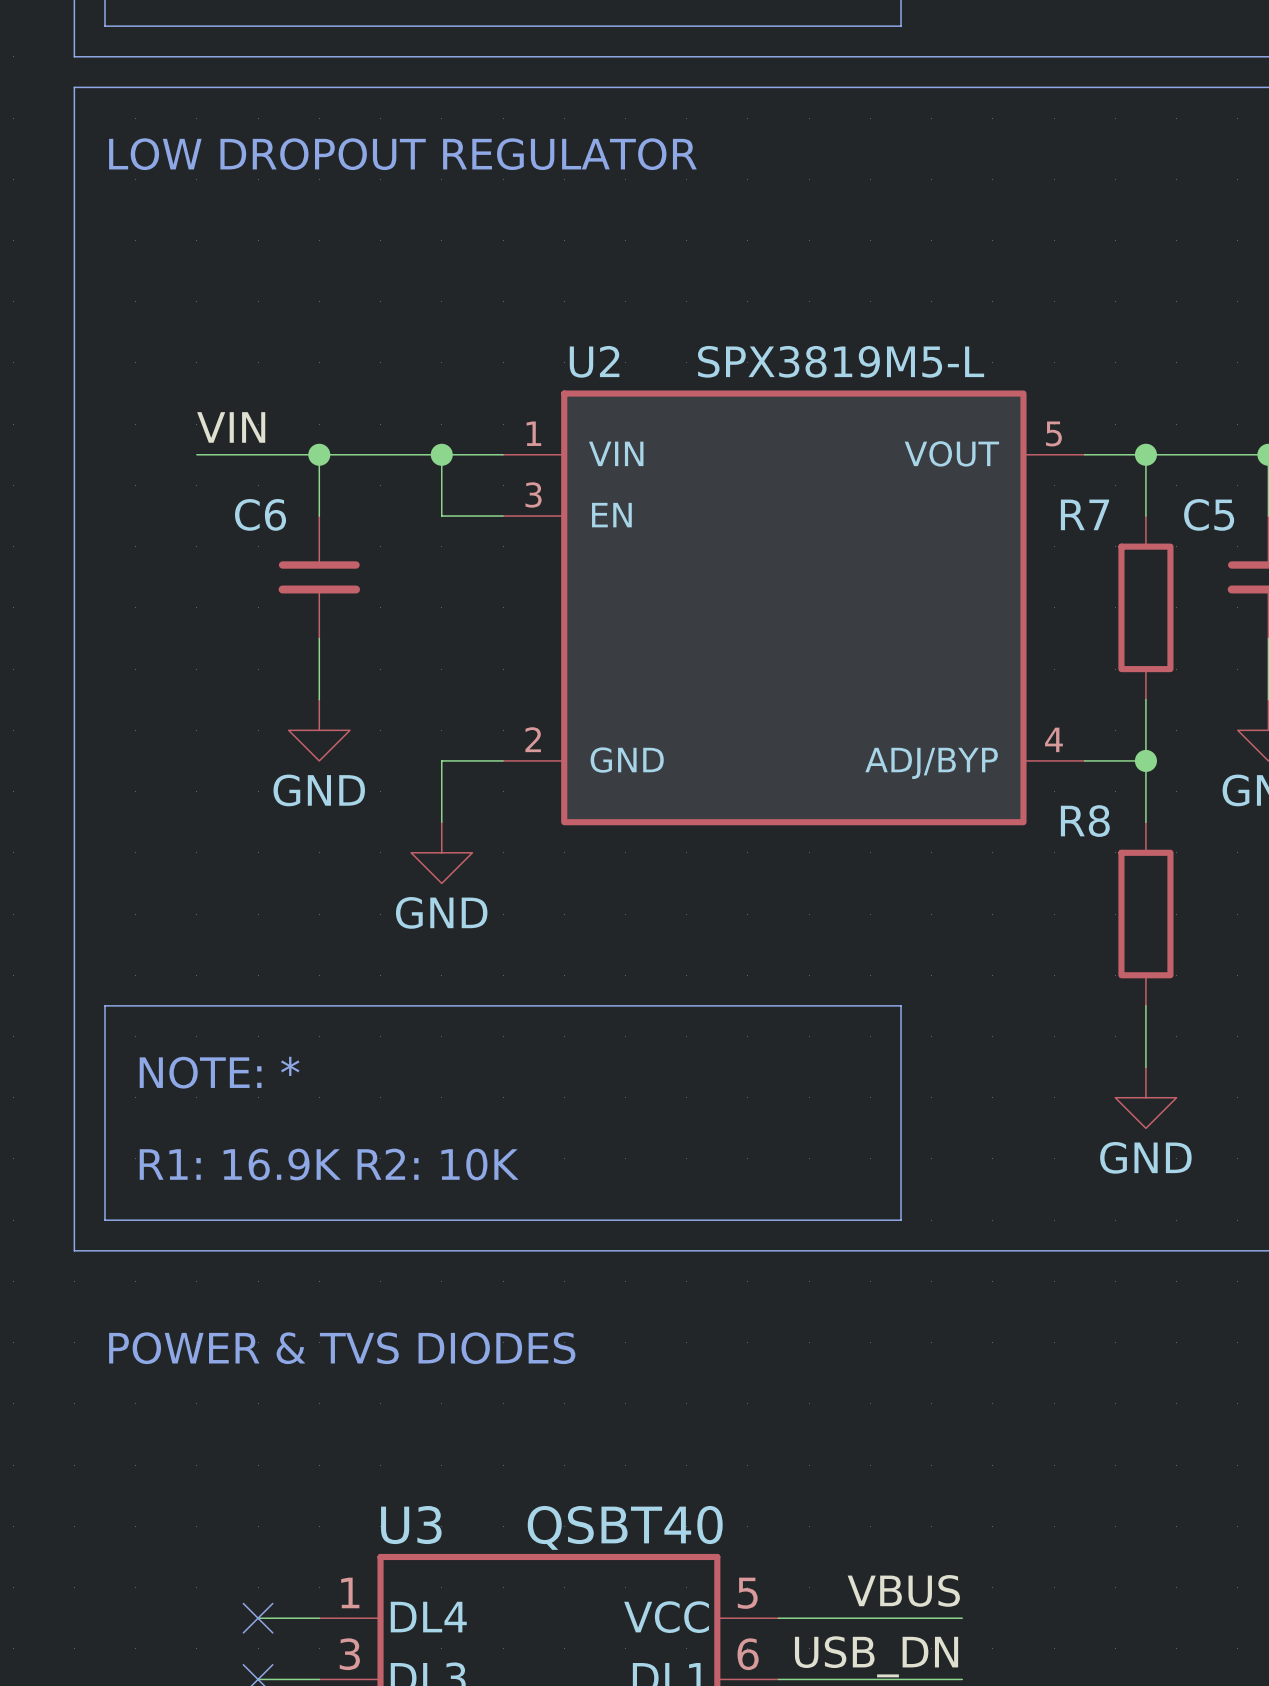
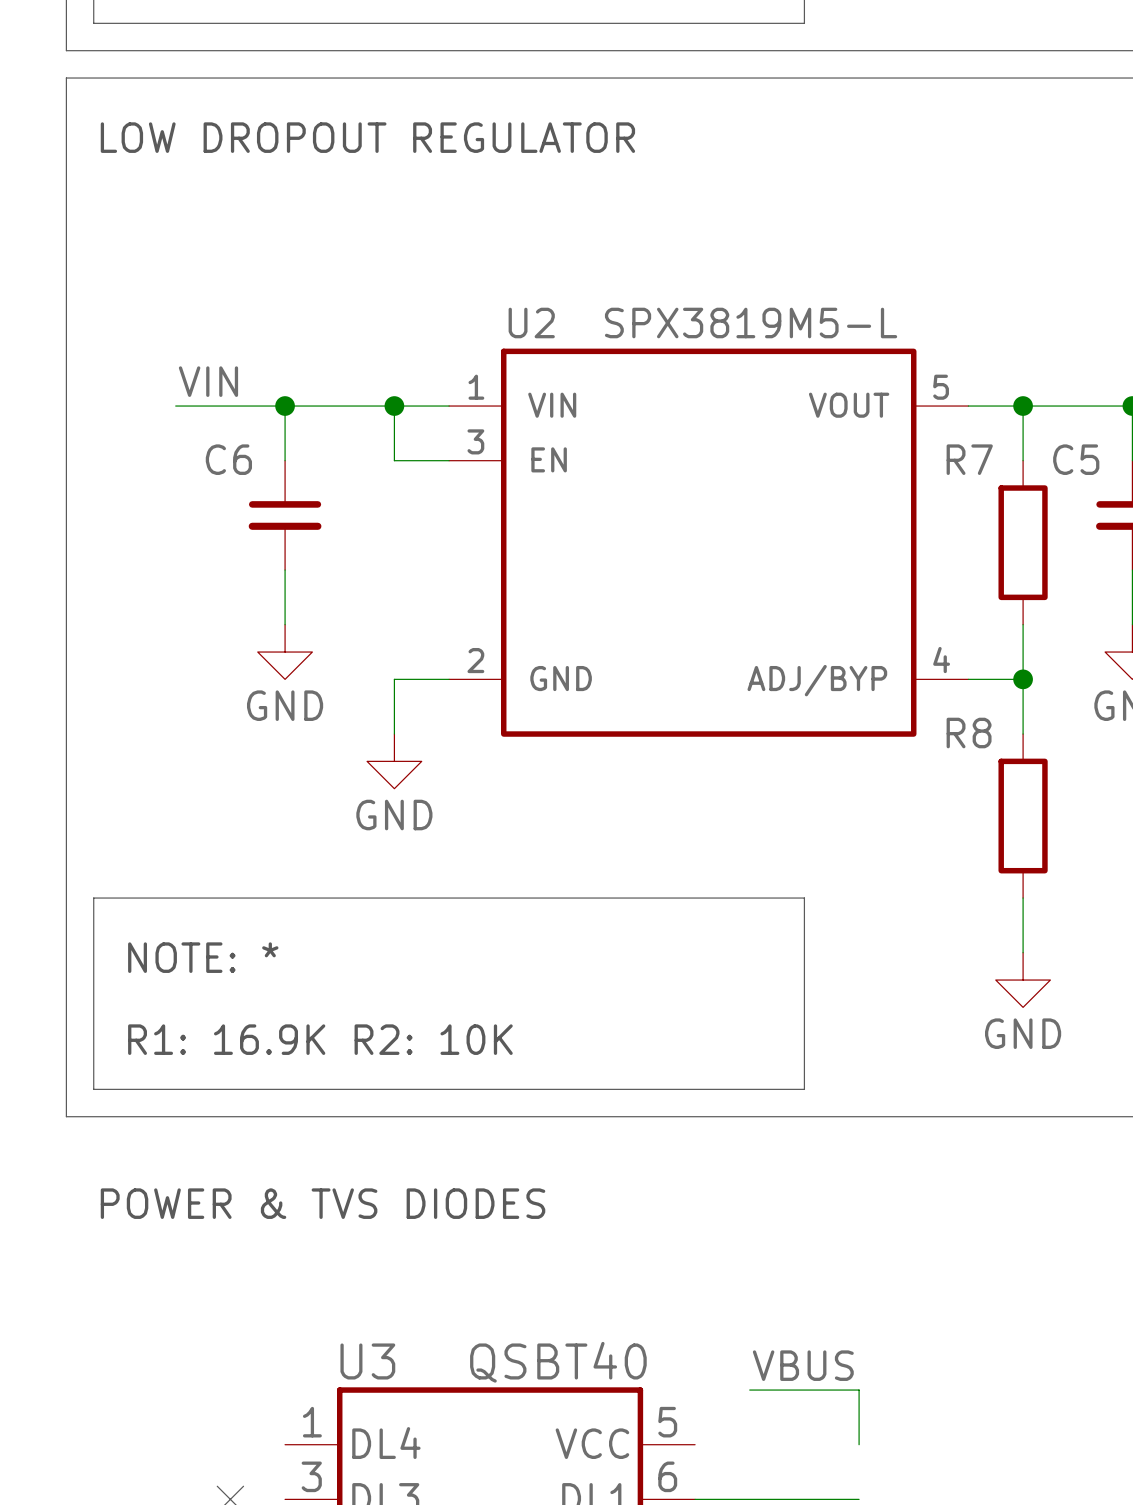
label position: VBUS (903, 1590) -> VBUS (803, 1365)
wire: (258, 1618) (319, 1618) -> none
no-connect mark: (258, 1618) -> none
wire: (778, 1618) (962, 1618) -> (749, 1390) (859, 1390) (859, 1444)
label: USB_DN (876, 1656) -> none
wire: (258, 1679) (319, 1679) -> none

